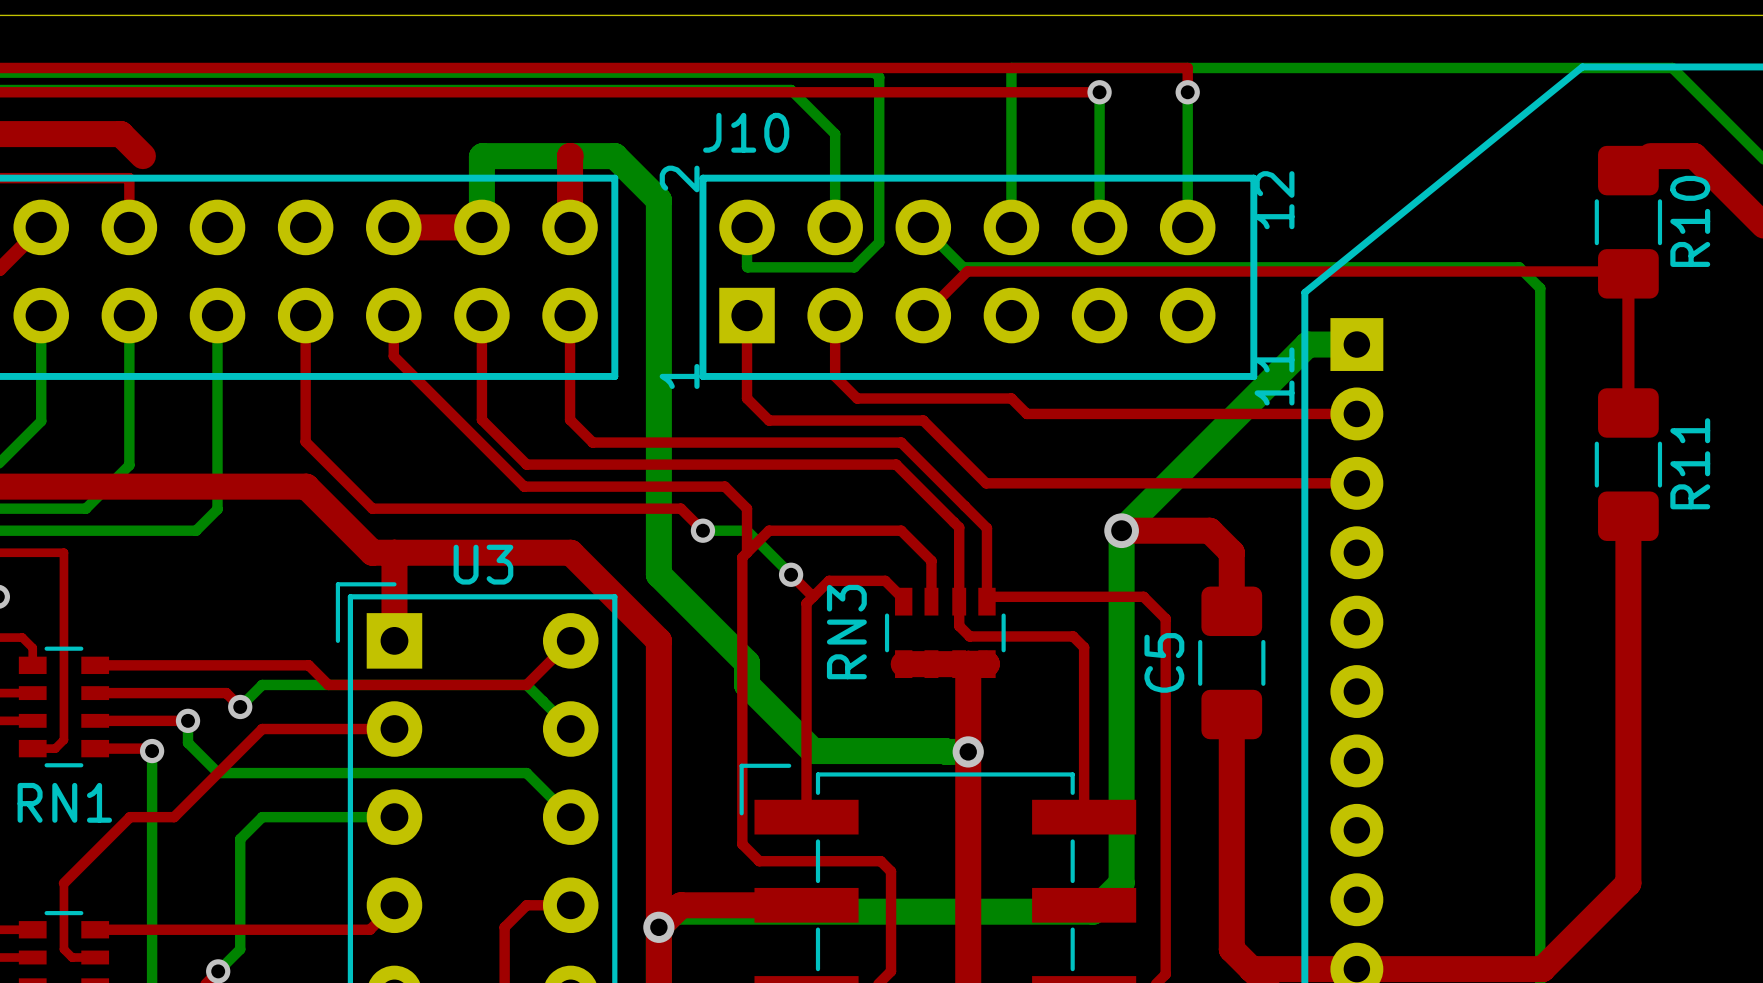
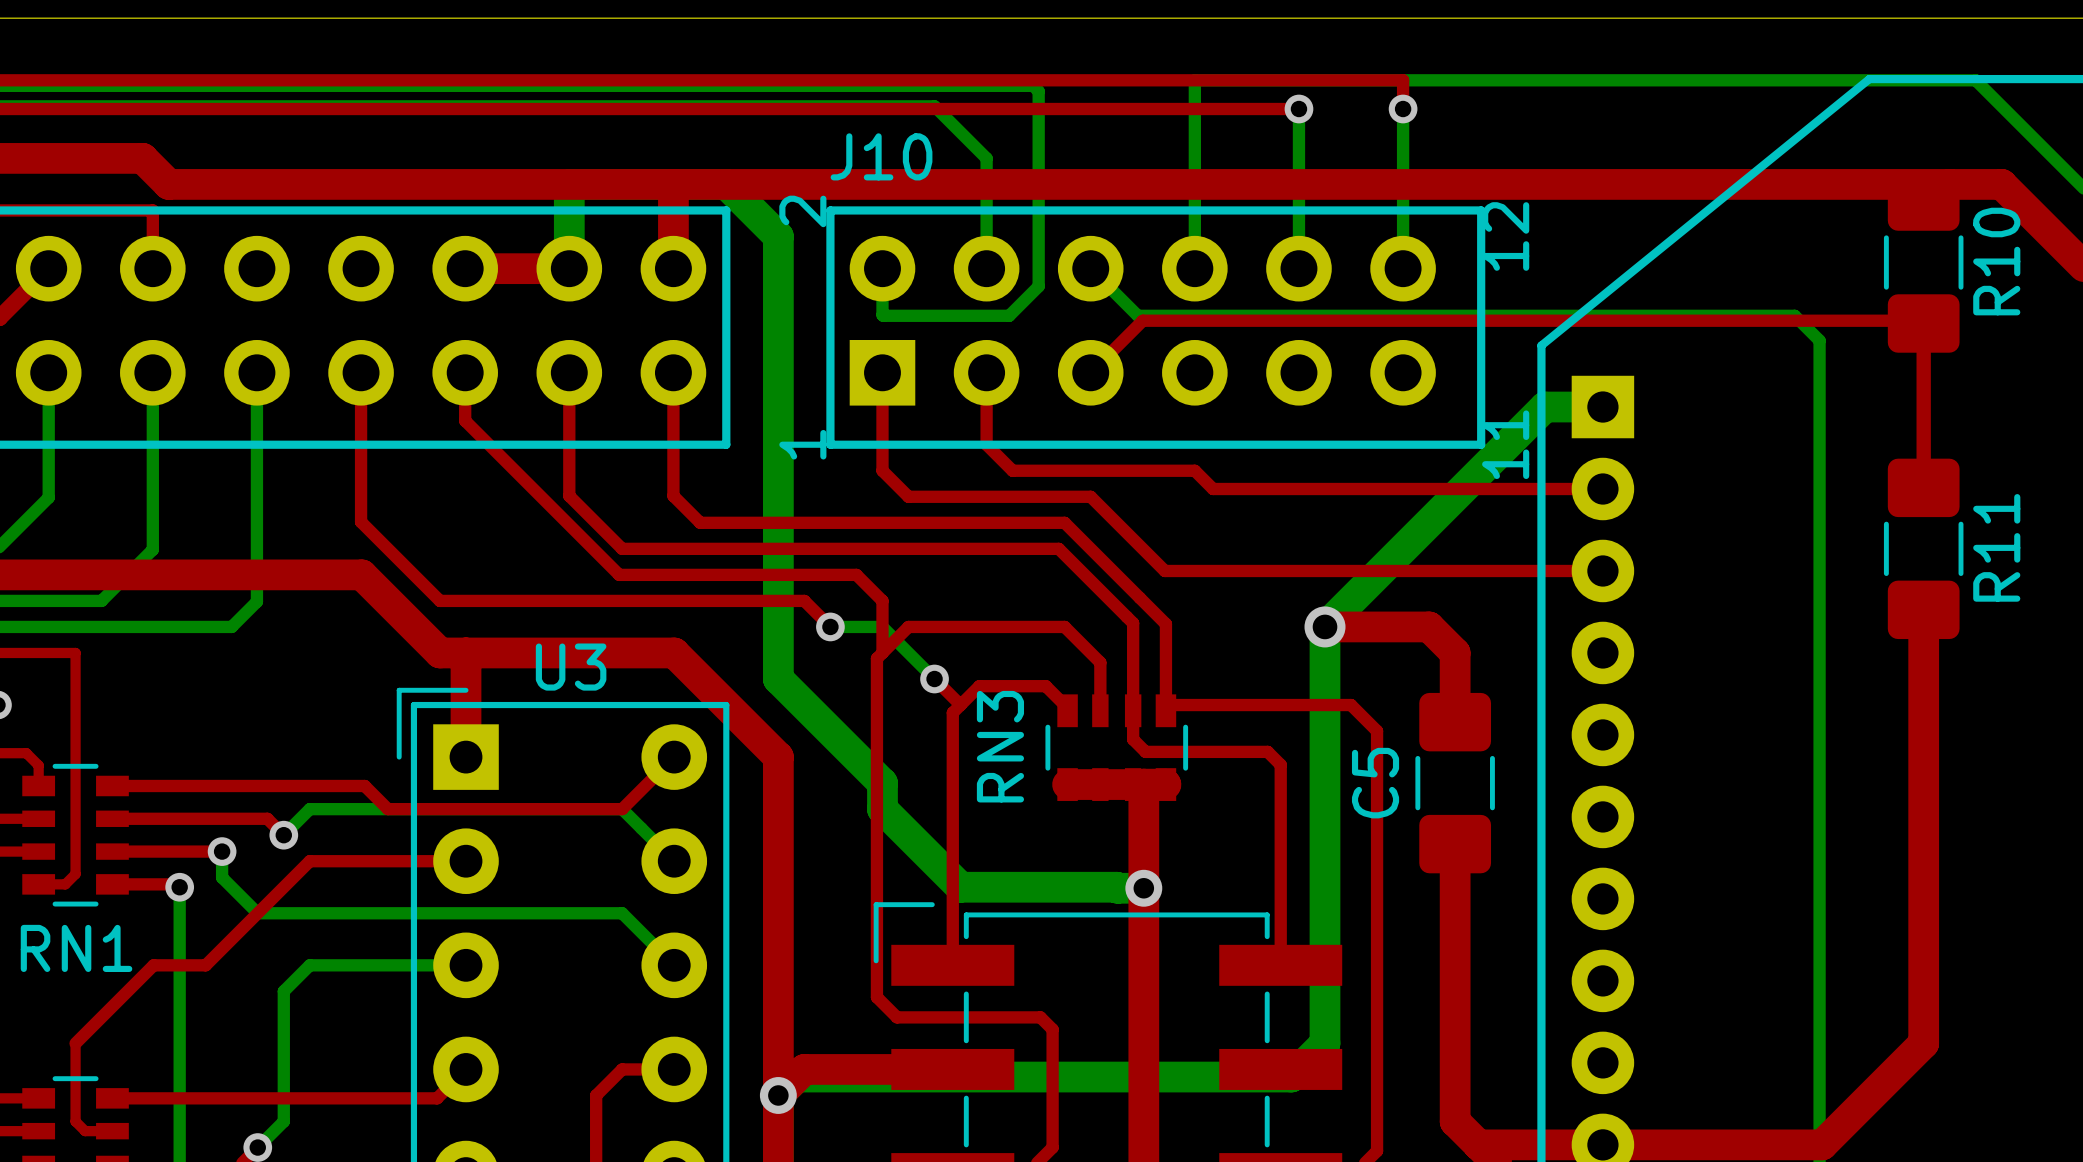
top track: none -> (168, 184) (673, 184)
top track: none -> (674, 184) (1949, 184)

